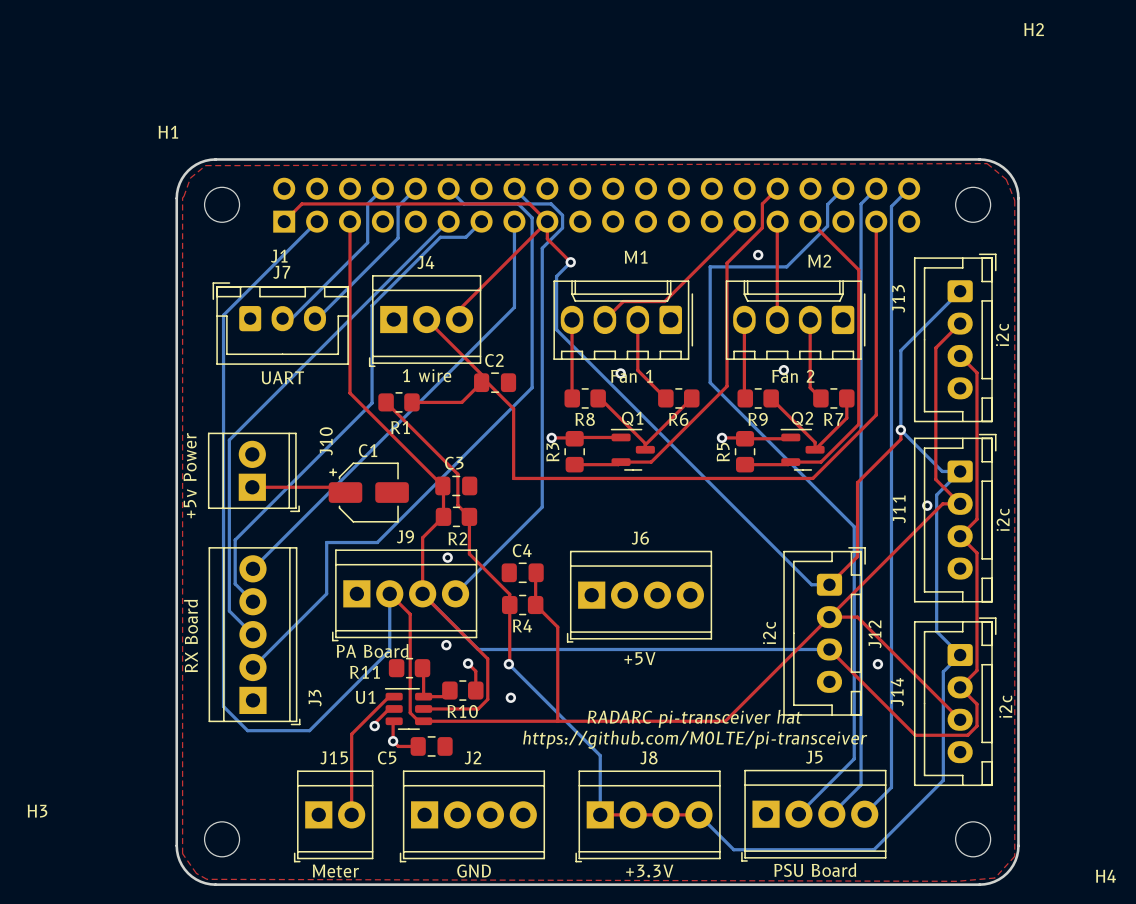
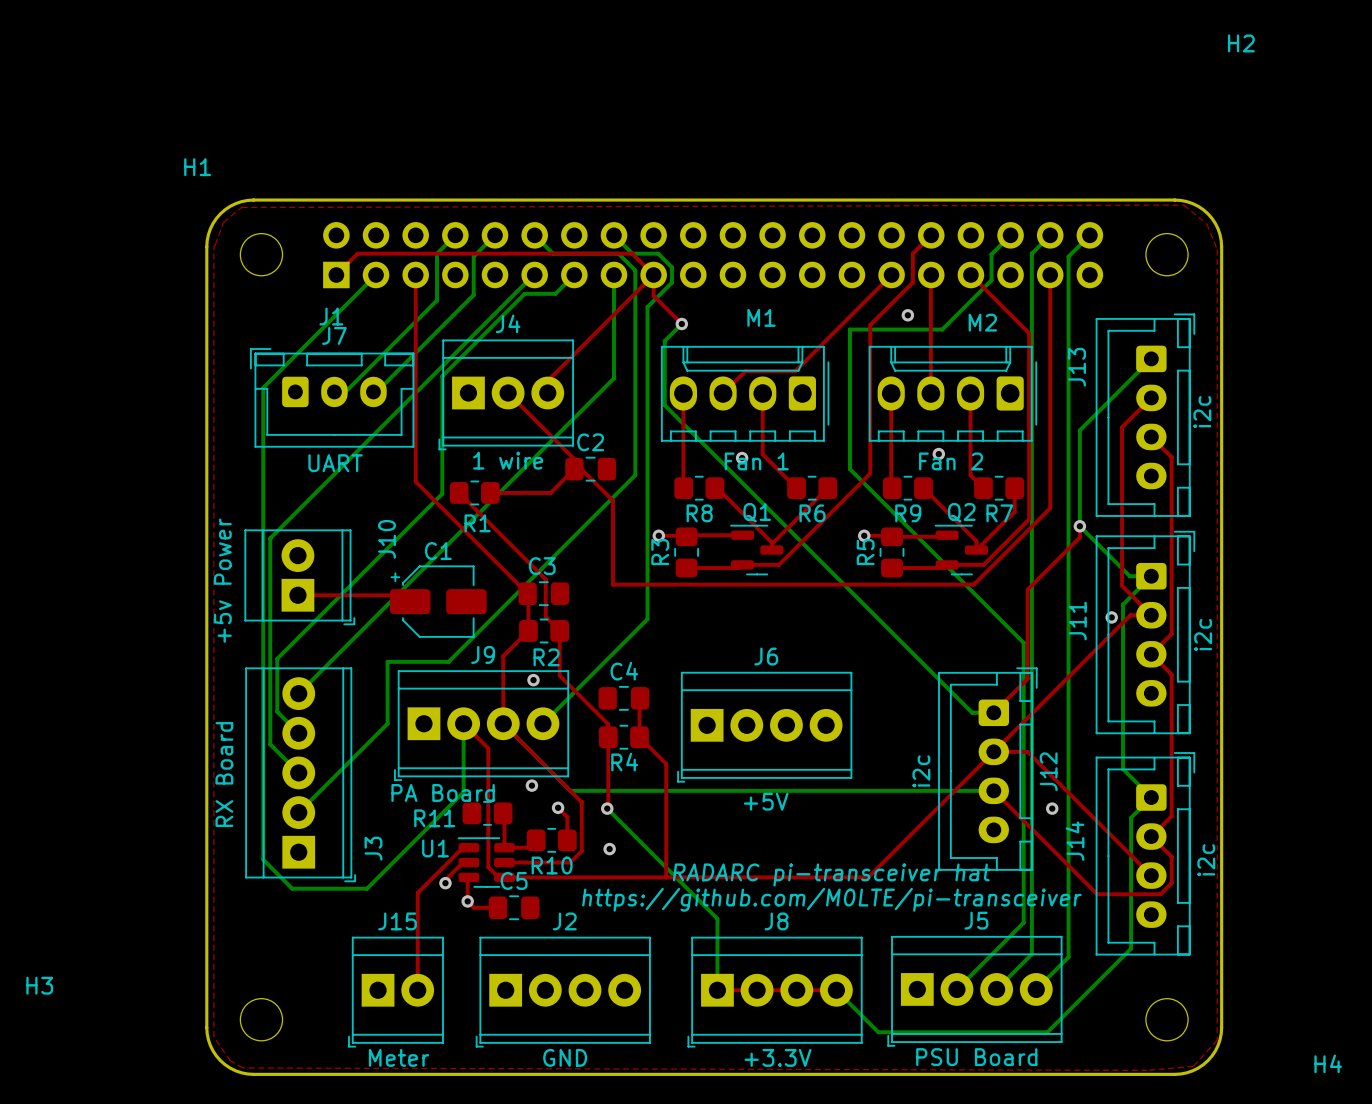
C5 name position: C5 (387, 757) -> C5 (514, 880)

